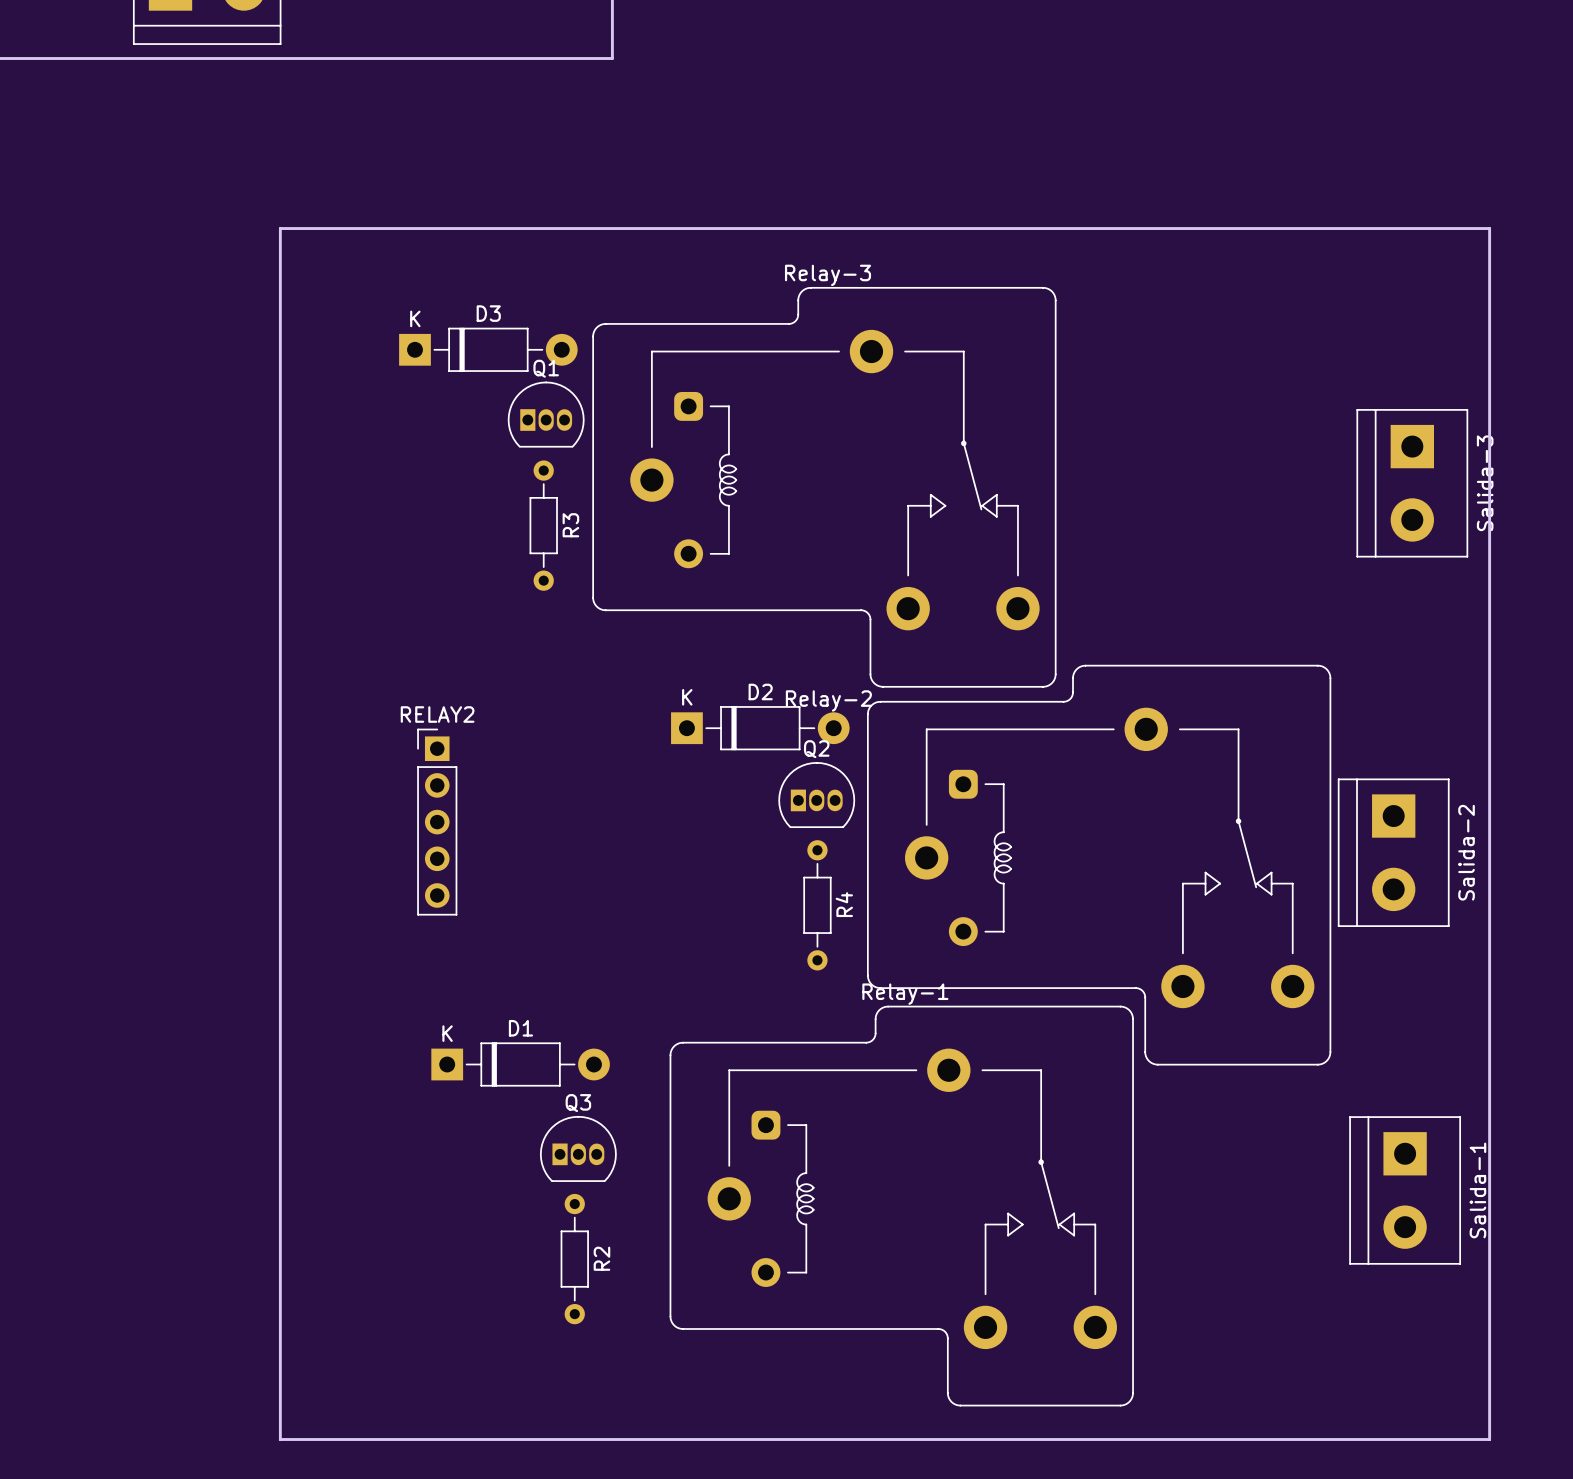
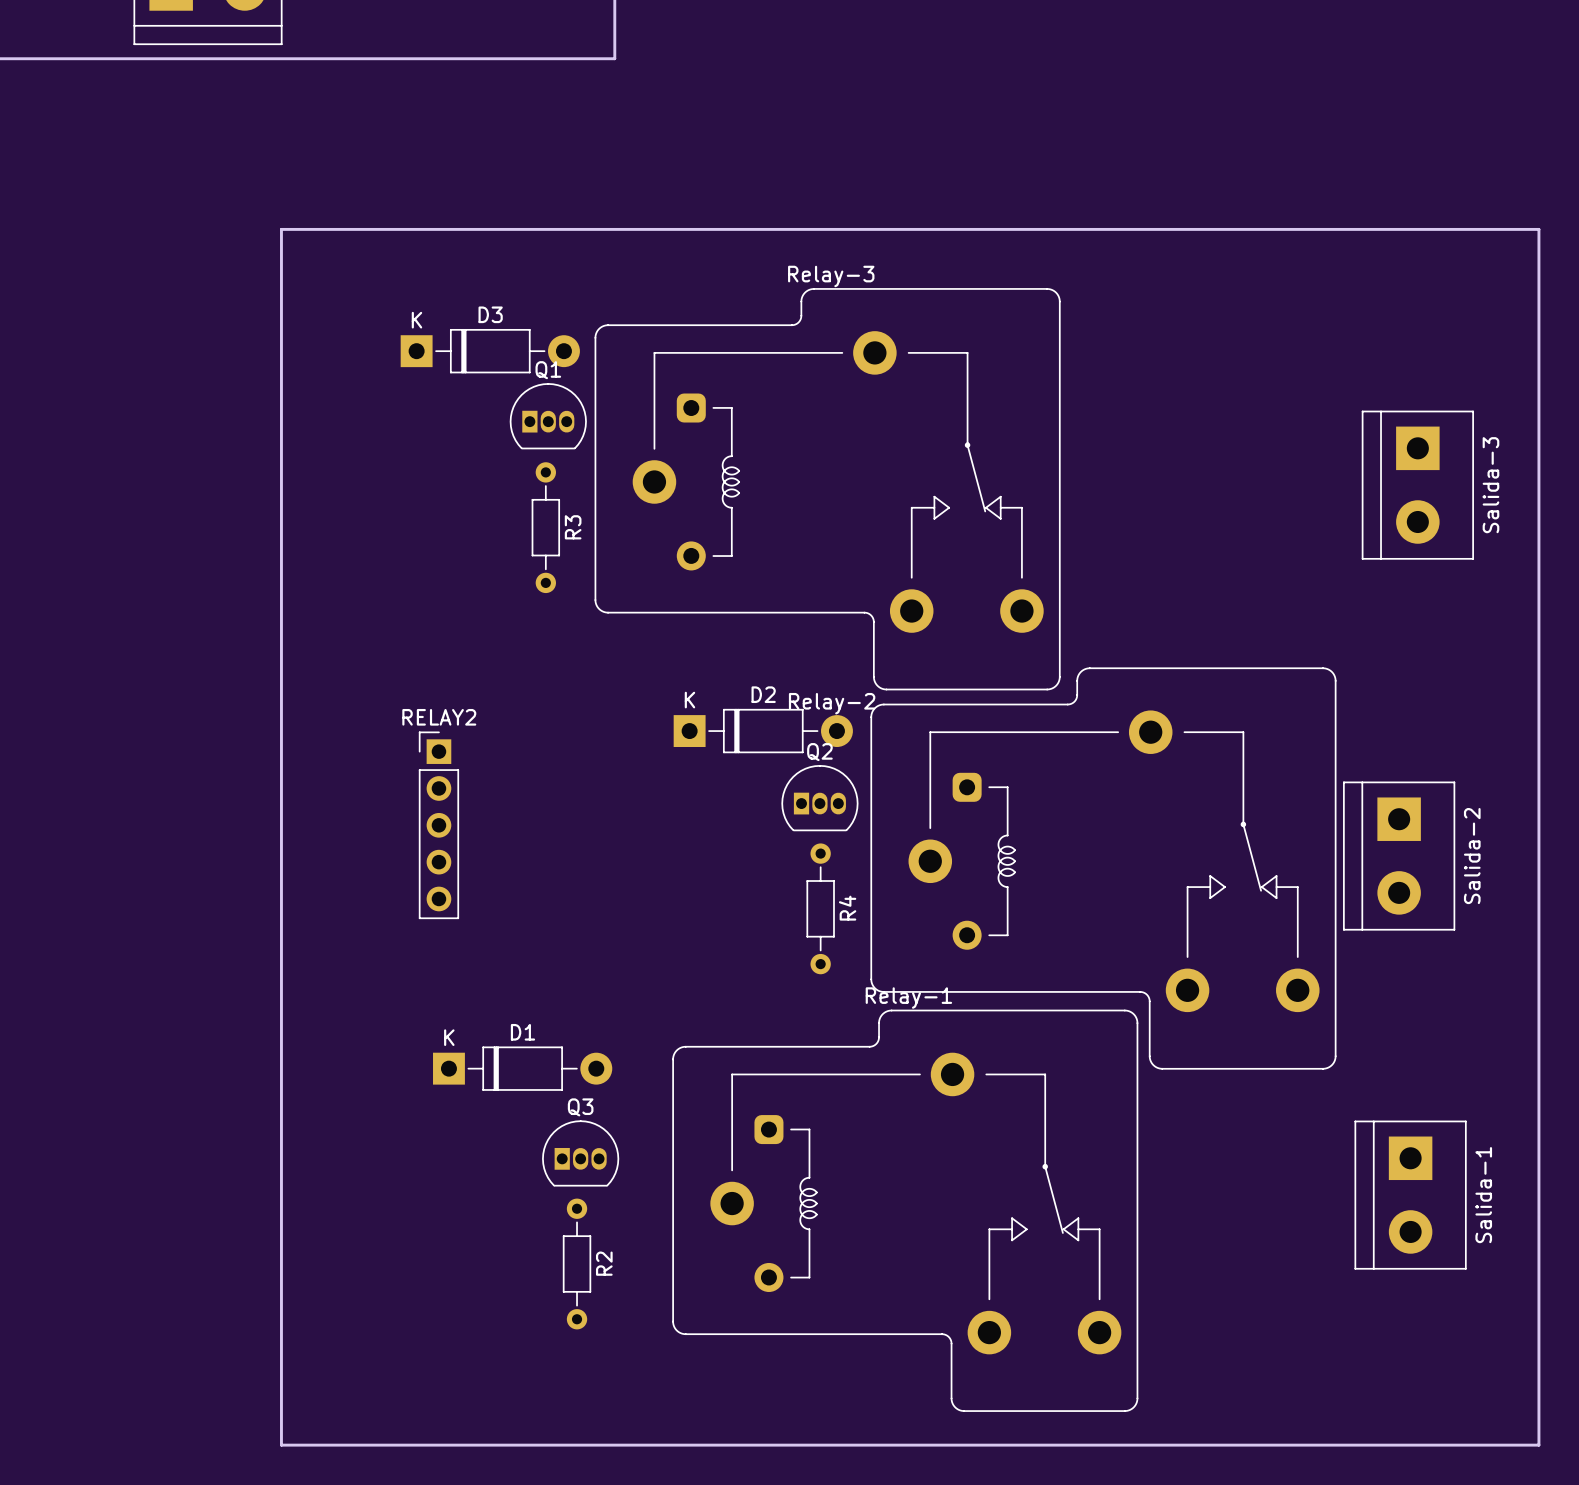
board edge: (1489, 228) (1489, 1439) -> (1495, 229) (1538, 229) (1538, 1445) (1495, 1445)

